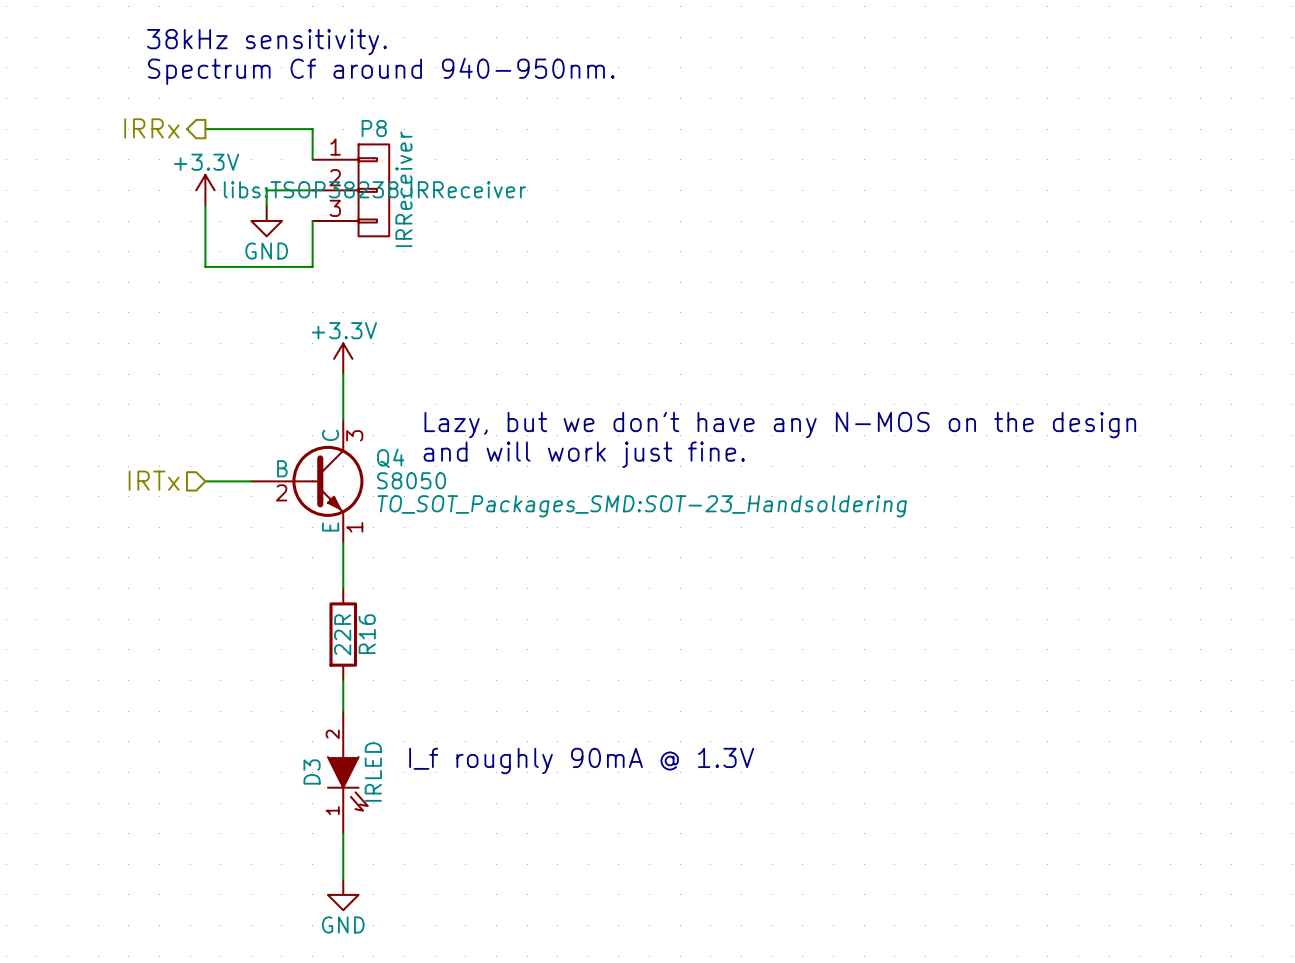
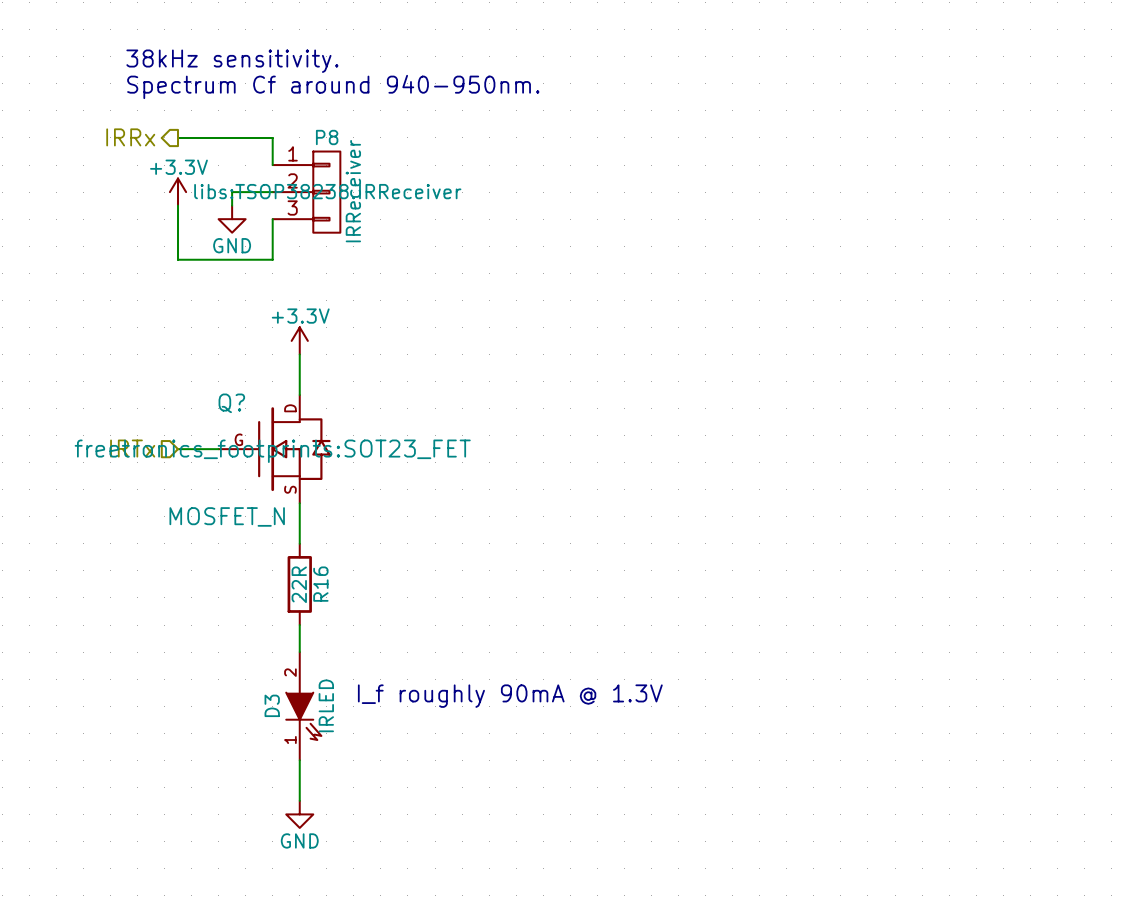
text: Lazy, but we don't have any N-MOS on the design (780, 425) -> none
text: and will work just fine. (584, 454) -> none
Q4: S8050 (307, 481) -> none
Q?: none -> MOSFET_N (274, 449)

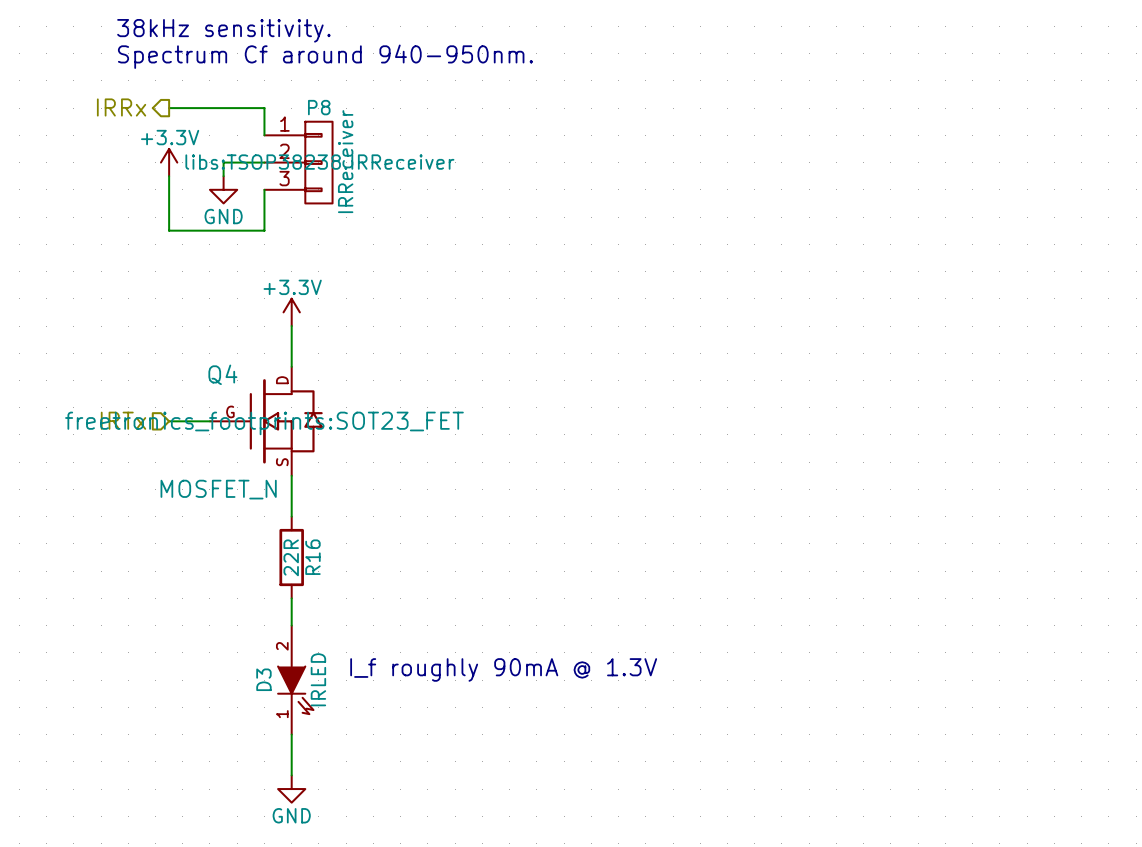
Q? name: Q? (231, 403) -> Q4 (222, 374)

